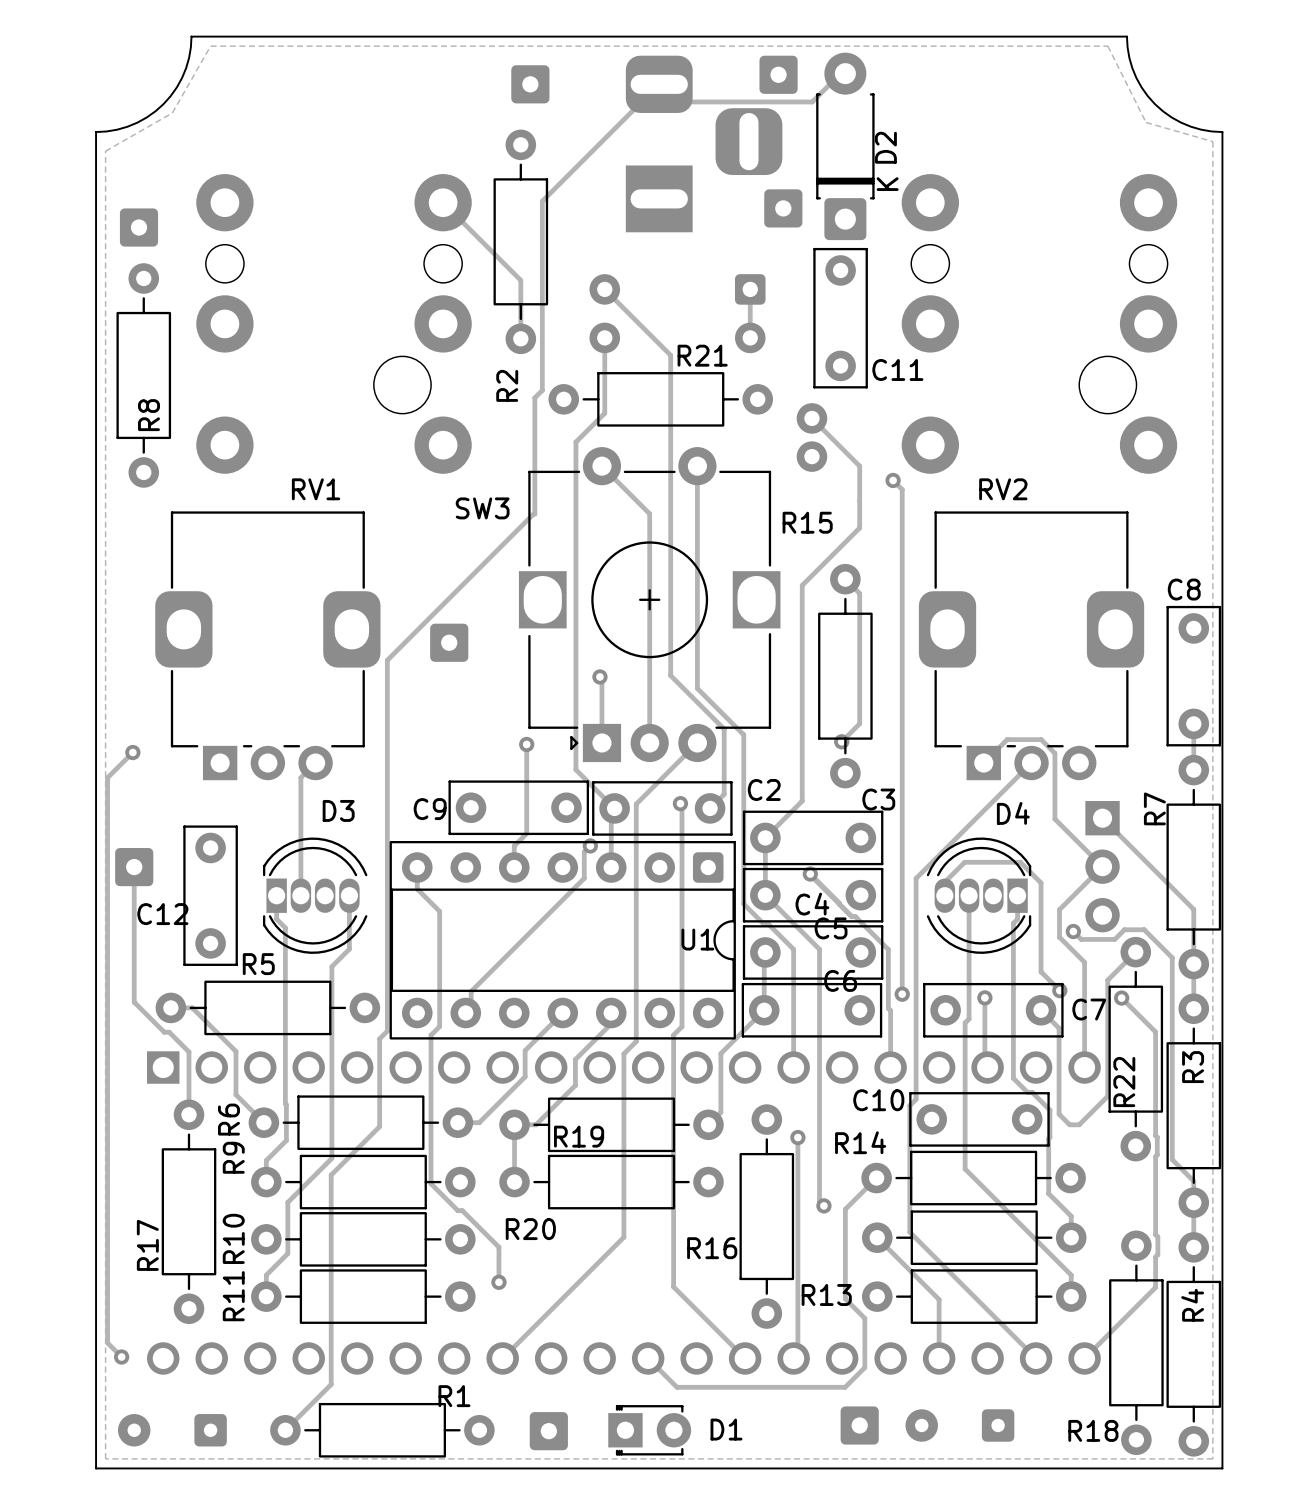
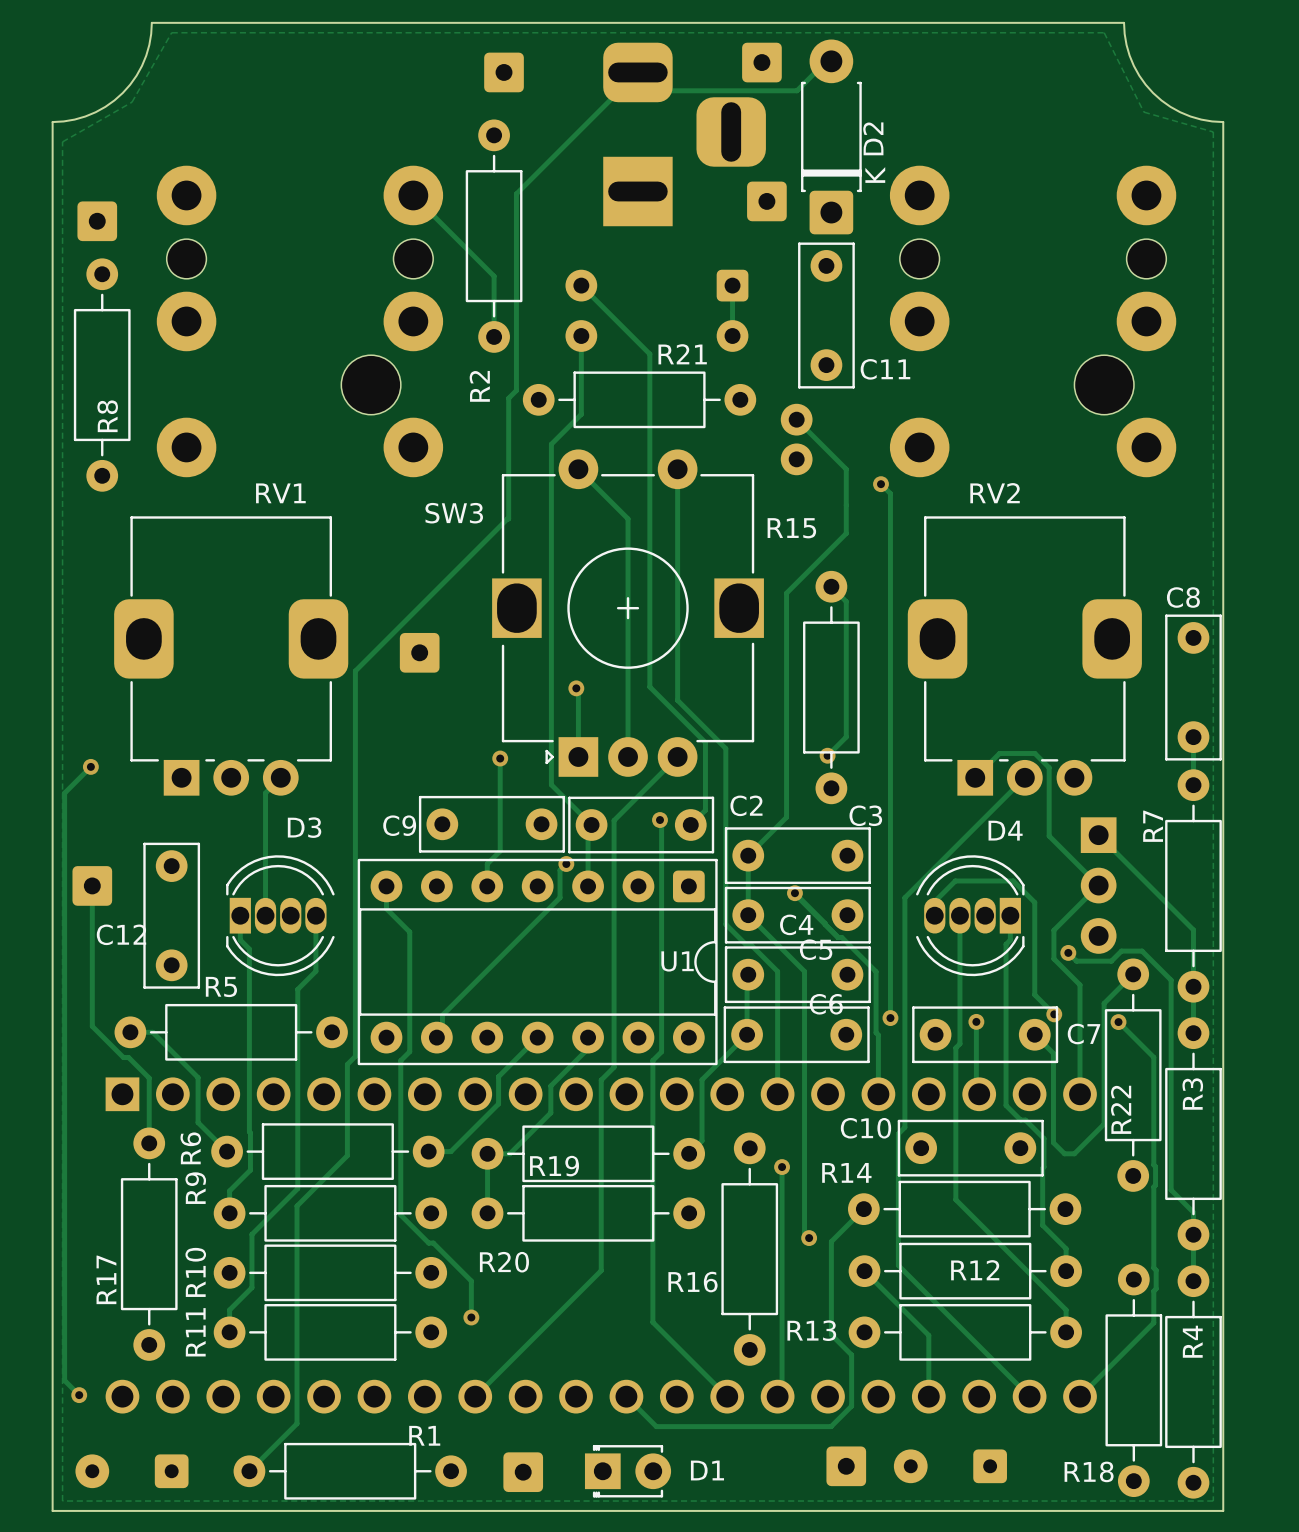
R12 name: none -> R12 (975, 1270)

